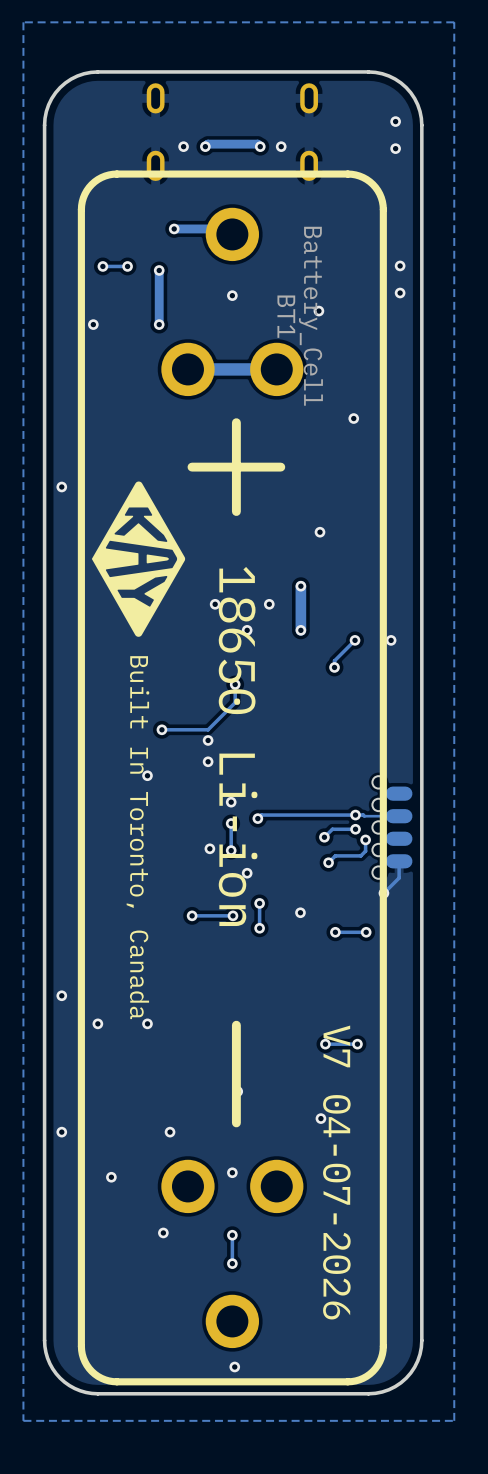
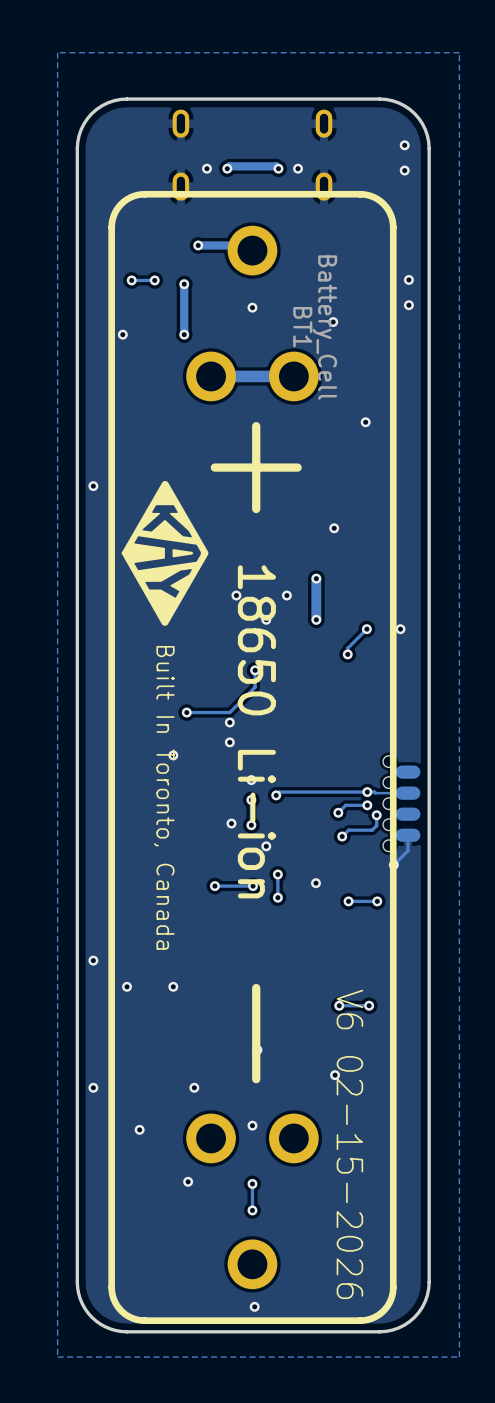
text: V7 04-07-2026 (336, 1172) -> V6 02-15-2026 (349, 1144)

